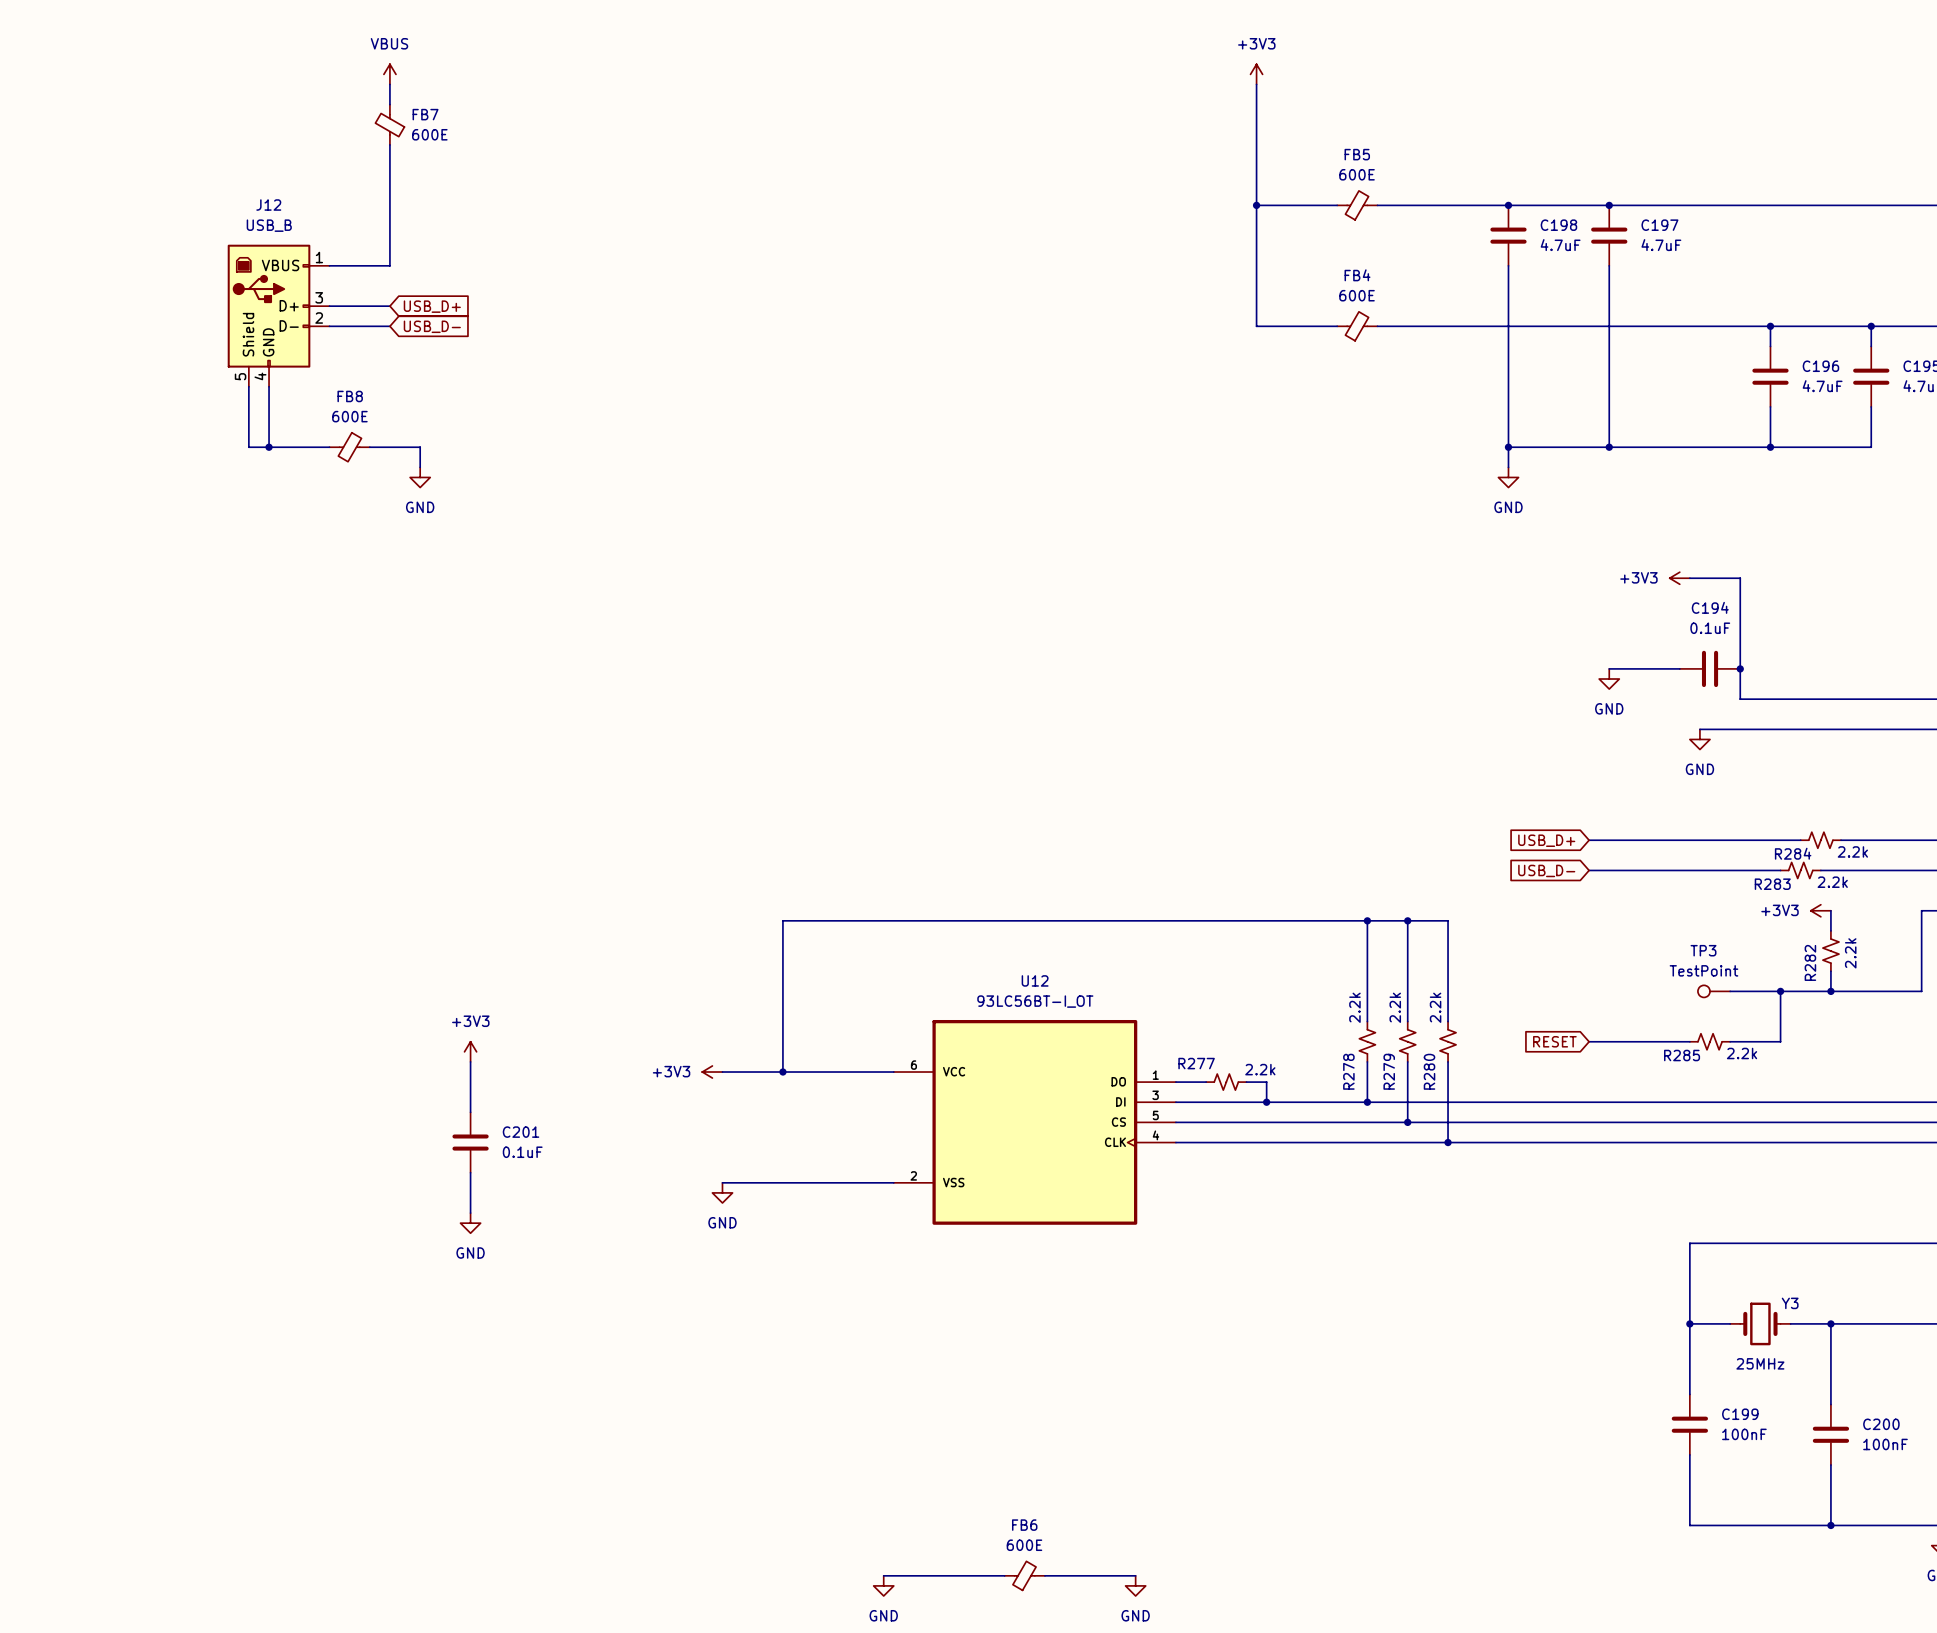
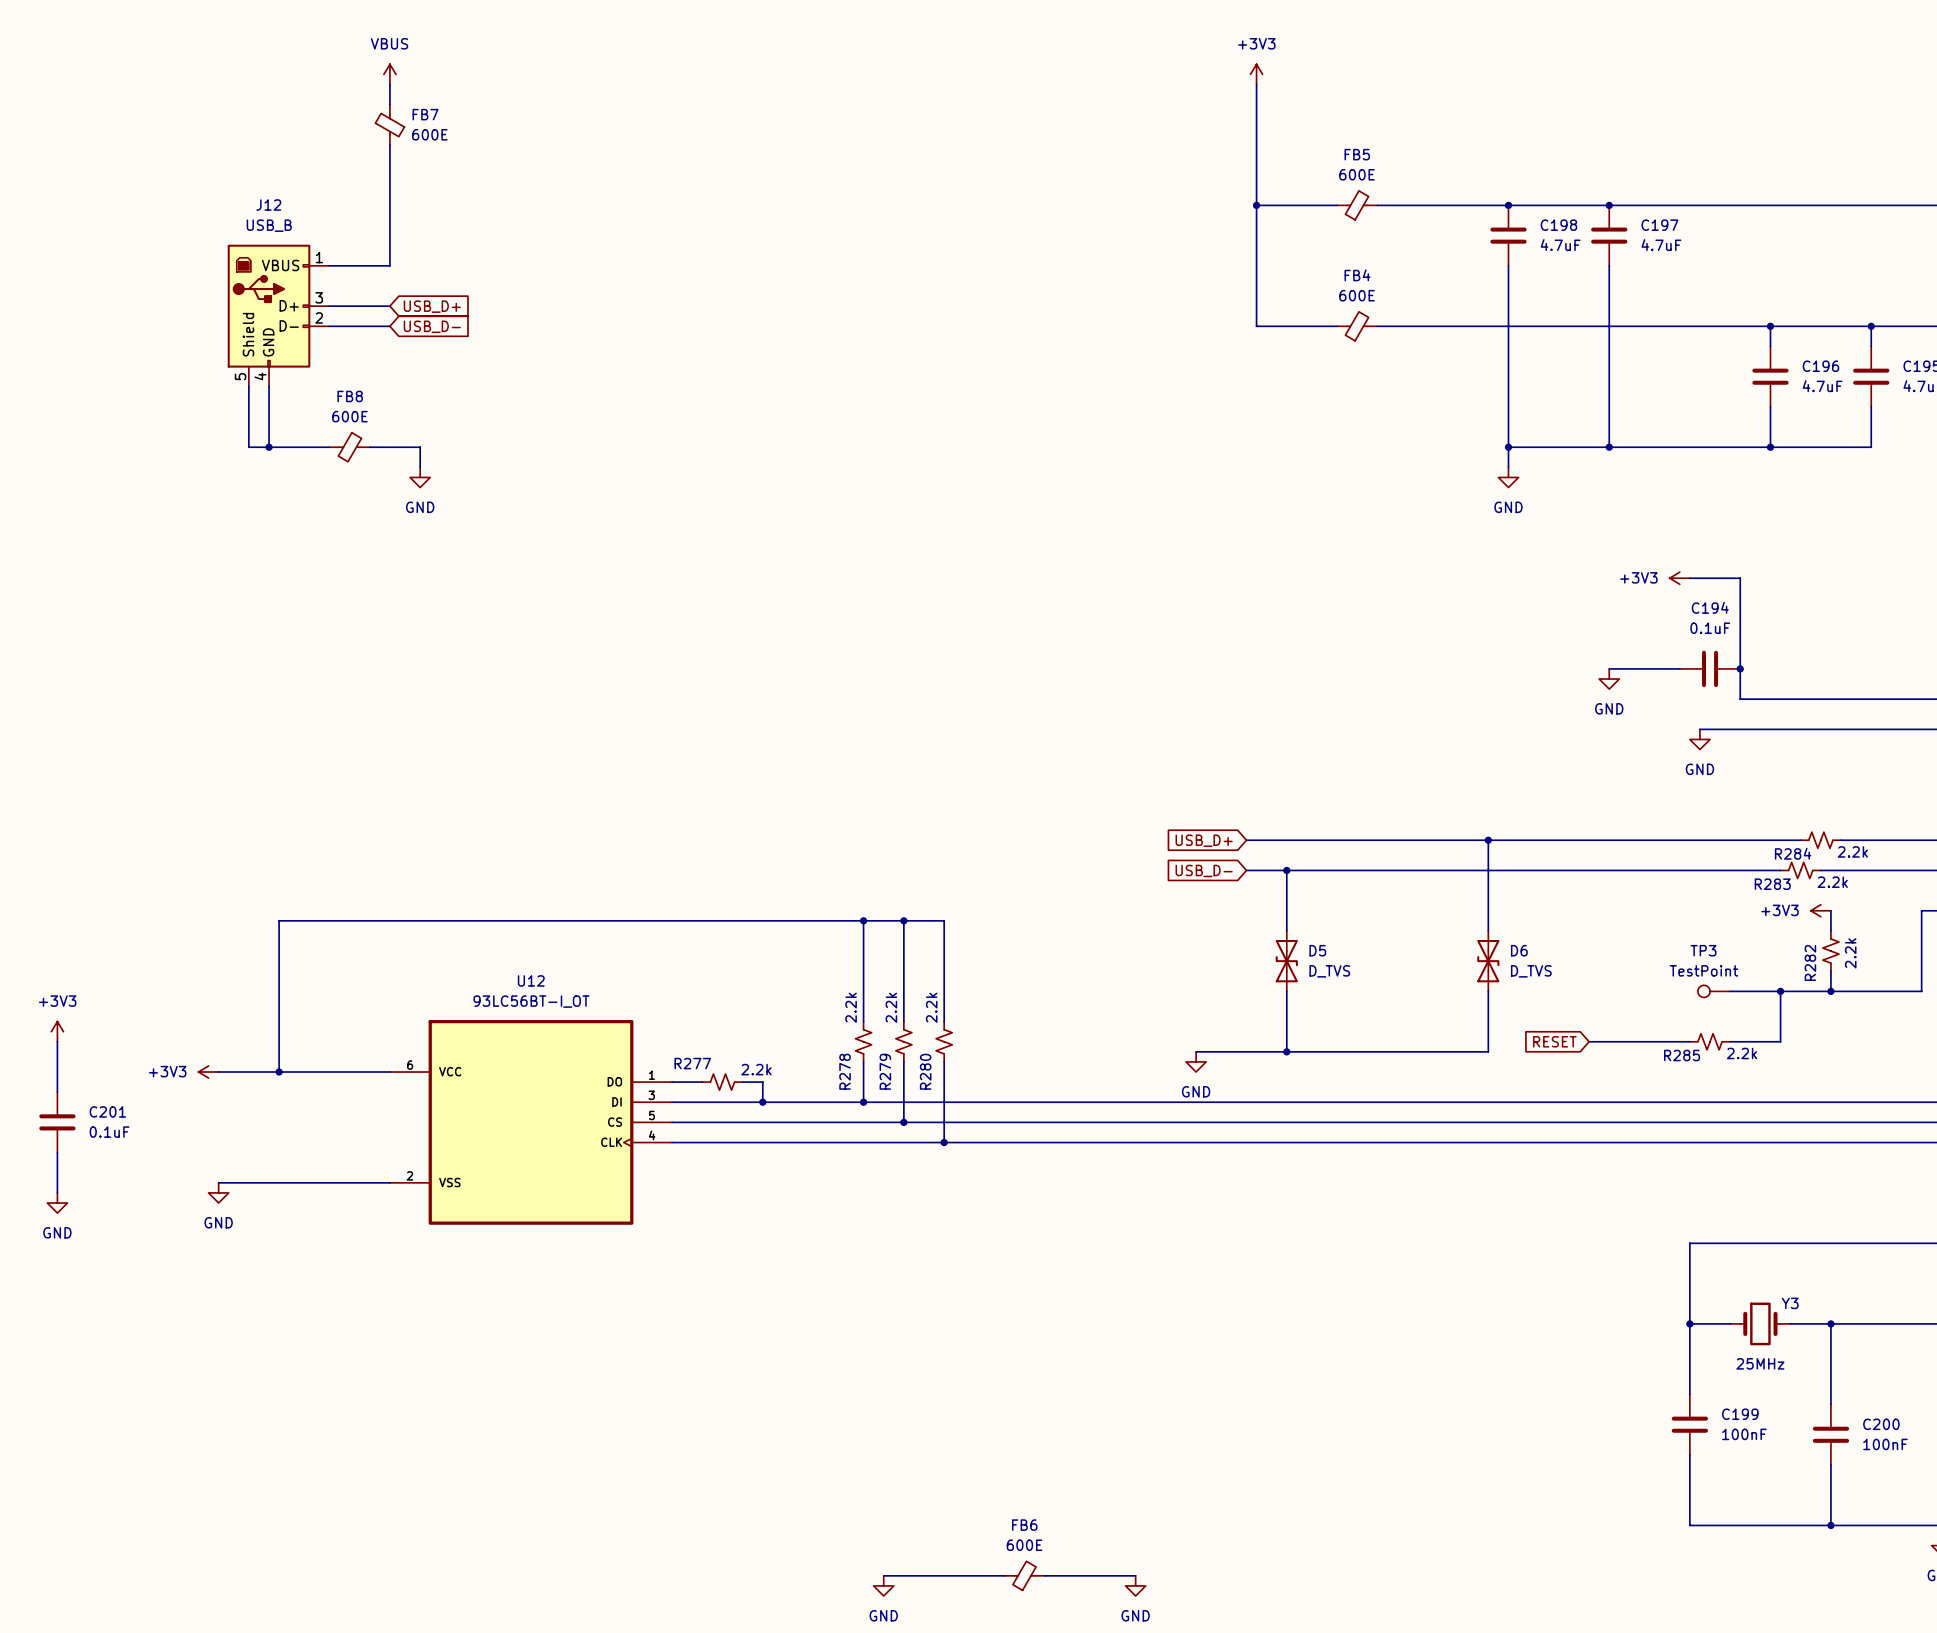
global label: none -> USB_D+ (1204, 840)
wire: none -> (1246, 840) (1589, 840)
wire: none -> (1488, 840) (1488, 930)
junction: none -> (1488, 840)
global label: USB_D+ (1546, 840) -> none
global label: none -> USB_D- (1204, 870)
wire: none -> (1246, 870) (1589, 870)
wire: none -> (1286, 870) (1286, 930)
junction: none -> (1286, 870)
global label: USB_D- (1546, 870) -> none
wire: (782, 920) (782, 1072) -> (782, 920) (279, 920) (279, 1072)
wire: none -> (863, 920) (863, 1021)
junction: none -> (863, 920)
wire: none -> (903, 920) (903, 1021)
junction: none -> (903, 920)
wire: (944, 920) (1448, 920) (1448, 1021) -> (944, 920) (944, 1021)
wire: (1367, 920) (1367, 1021) -> none
junction: (1367, 920) -> none
wire: (1407, 920) (1407, 1021) -> none
junction: (1407, 920) -> none
D5: none -> D_TVS (1286, 961)
D6: none -> D_TVS (1488, 961)
wire: none -> (1488, 991) (1488, 1051) (1196, 1051)
power symbol: none -> +3V3 (57, 1031)
wire: none -> (57, 1041) (57, 1092)
R278 position: (1367, 1041) -> (863, 1041)
R279 position: (1407, 1041) -> (903, 1041)
R280 position: (1448, 1041) -> (944, 1041)
power symbol: +3V3 (470, 1051) -> none
junction: none -> (1286, 1051)
wire: none -> (863, 1061) (863, 1102)
wire: none -> (903, 1061) (903, 1122)
power symbol: none -> GND (1196, 1061)
wire: (1367, 1061) (1367, 1102) -> none
wire: (1407, 1061) (1407, 1122) -> (1286, 991) (1286, 1051)
wire: (1448, 1061) (1448, 1142) -> none
power symbol: none -> +3V3 (208, 1072)
wire: none -> (218, 1072) (389, 1072)
junction: none -> (279, 1072)
power symbol: +3V3 (712, 1072) -> none
wire: (722, 1072) (893, 1072) -> none
junction position: (782, 1072) -> (762, 1102)
wire: none -> (672, 1082) (702, 1082)
wire: none -> (742, 1082) (762, 1082) (762, 1102)
wire: (1175, 1082) (1206, 1082) -> none
R277 position: (1226, 1082) -> (722, 1082)
wire: (1246, 1082) (1266, 1082) (1266, 1102) -> none
wire: none -> (672, 1102) (1175, 1102)
junction: none -> (863, 1102)
junction: (1266, 1102) -> none
junction: (1367, 1102) -> none
wire: none -> (672, 1122) (1175, 1122)
junction: none -> (903, 1122)
U12 position: (1034, 1122) -> (531, 1122)
junction: (1407, 1122) -> none
C201 position: (470, 1142) -> (57, 1122)
wire: none -> (672, 1142) (1175, 1142)
junction: none -> (944, 1142)
junction: (1448, 1142) -> none
wire: none -> (57, 1152) (57, 1192)
wire: none -> (218, 1182) (389, 1182)
wire: (722, 1182) (893, 1182) -> none
power symbol: none -> GND (218, 1192)
power symbol: GND (722, 1192) -> none
power symbol: none -> GND (57, 1203)
power symbol: GND (470, 1223) -> none

